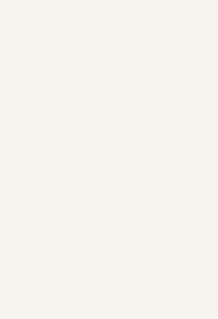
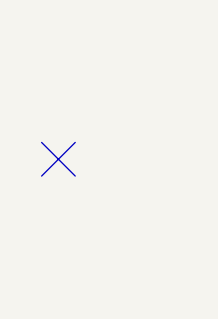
no-connect mark: none -> (58, 159)

